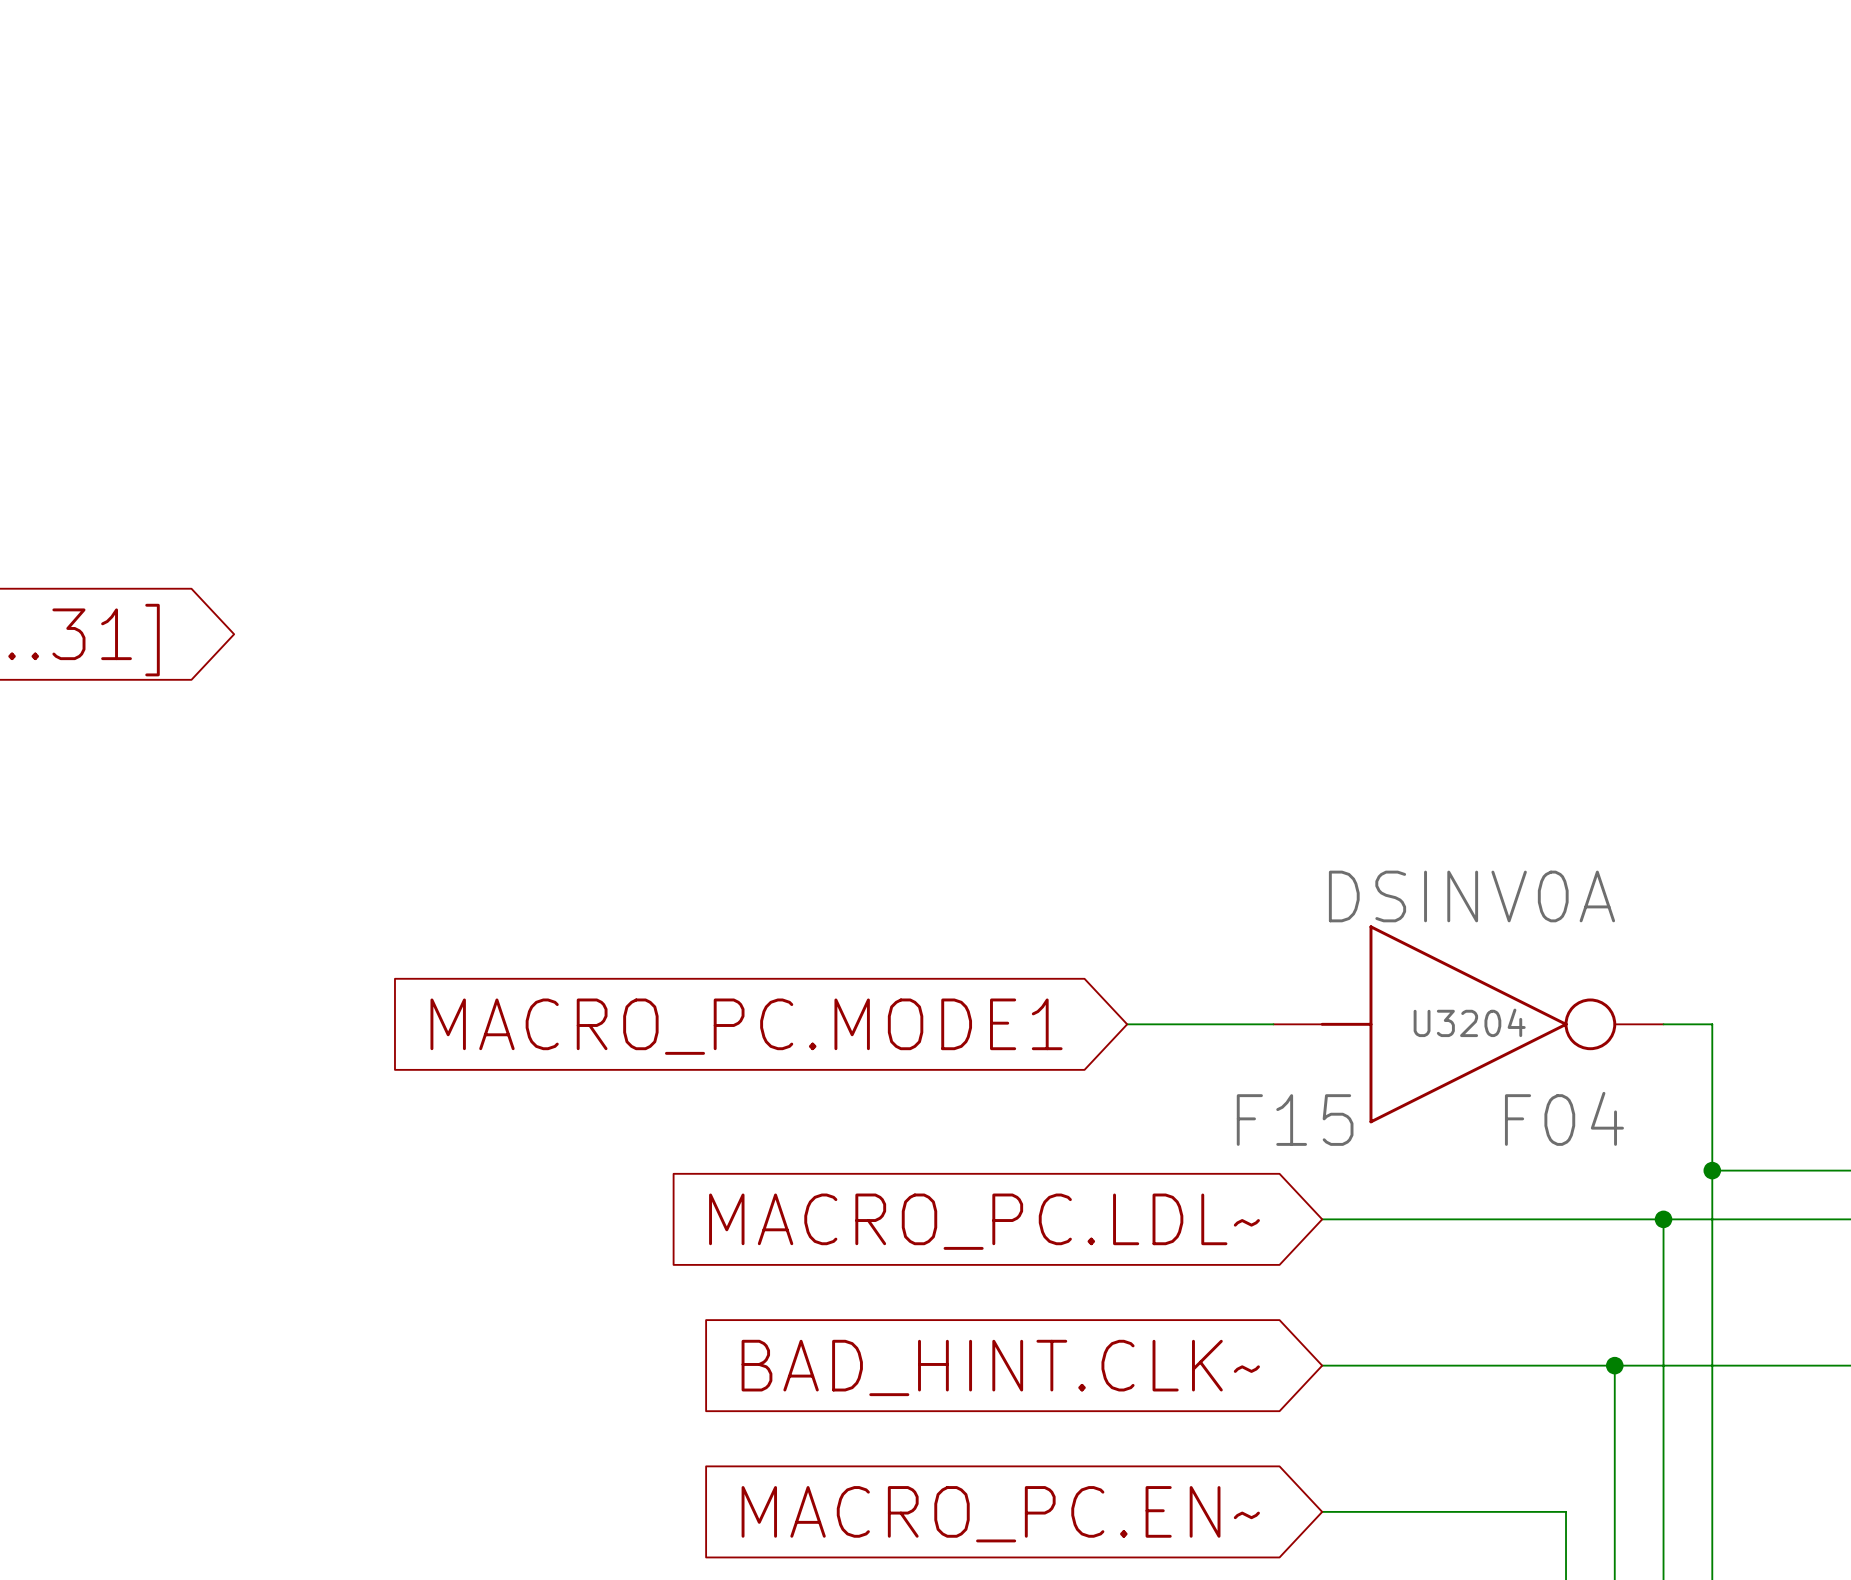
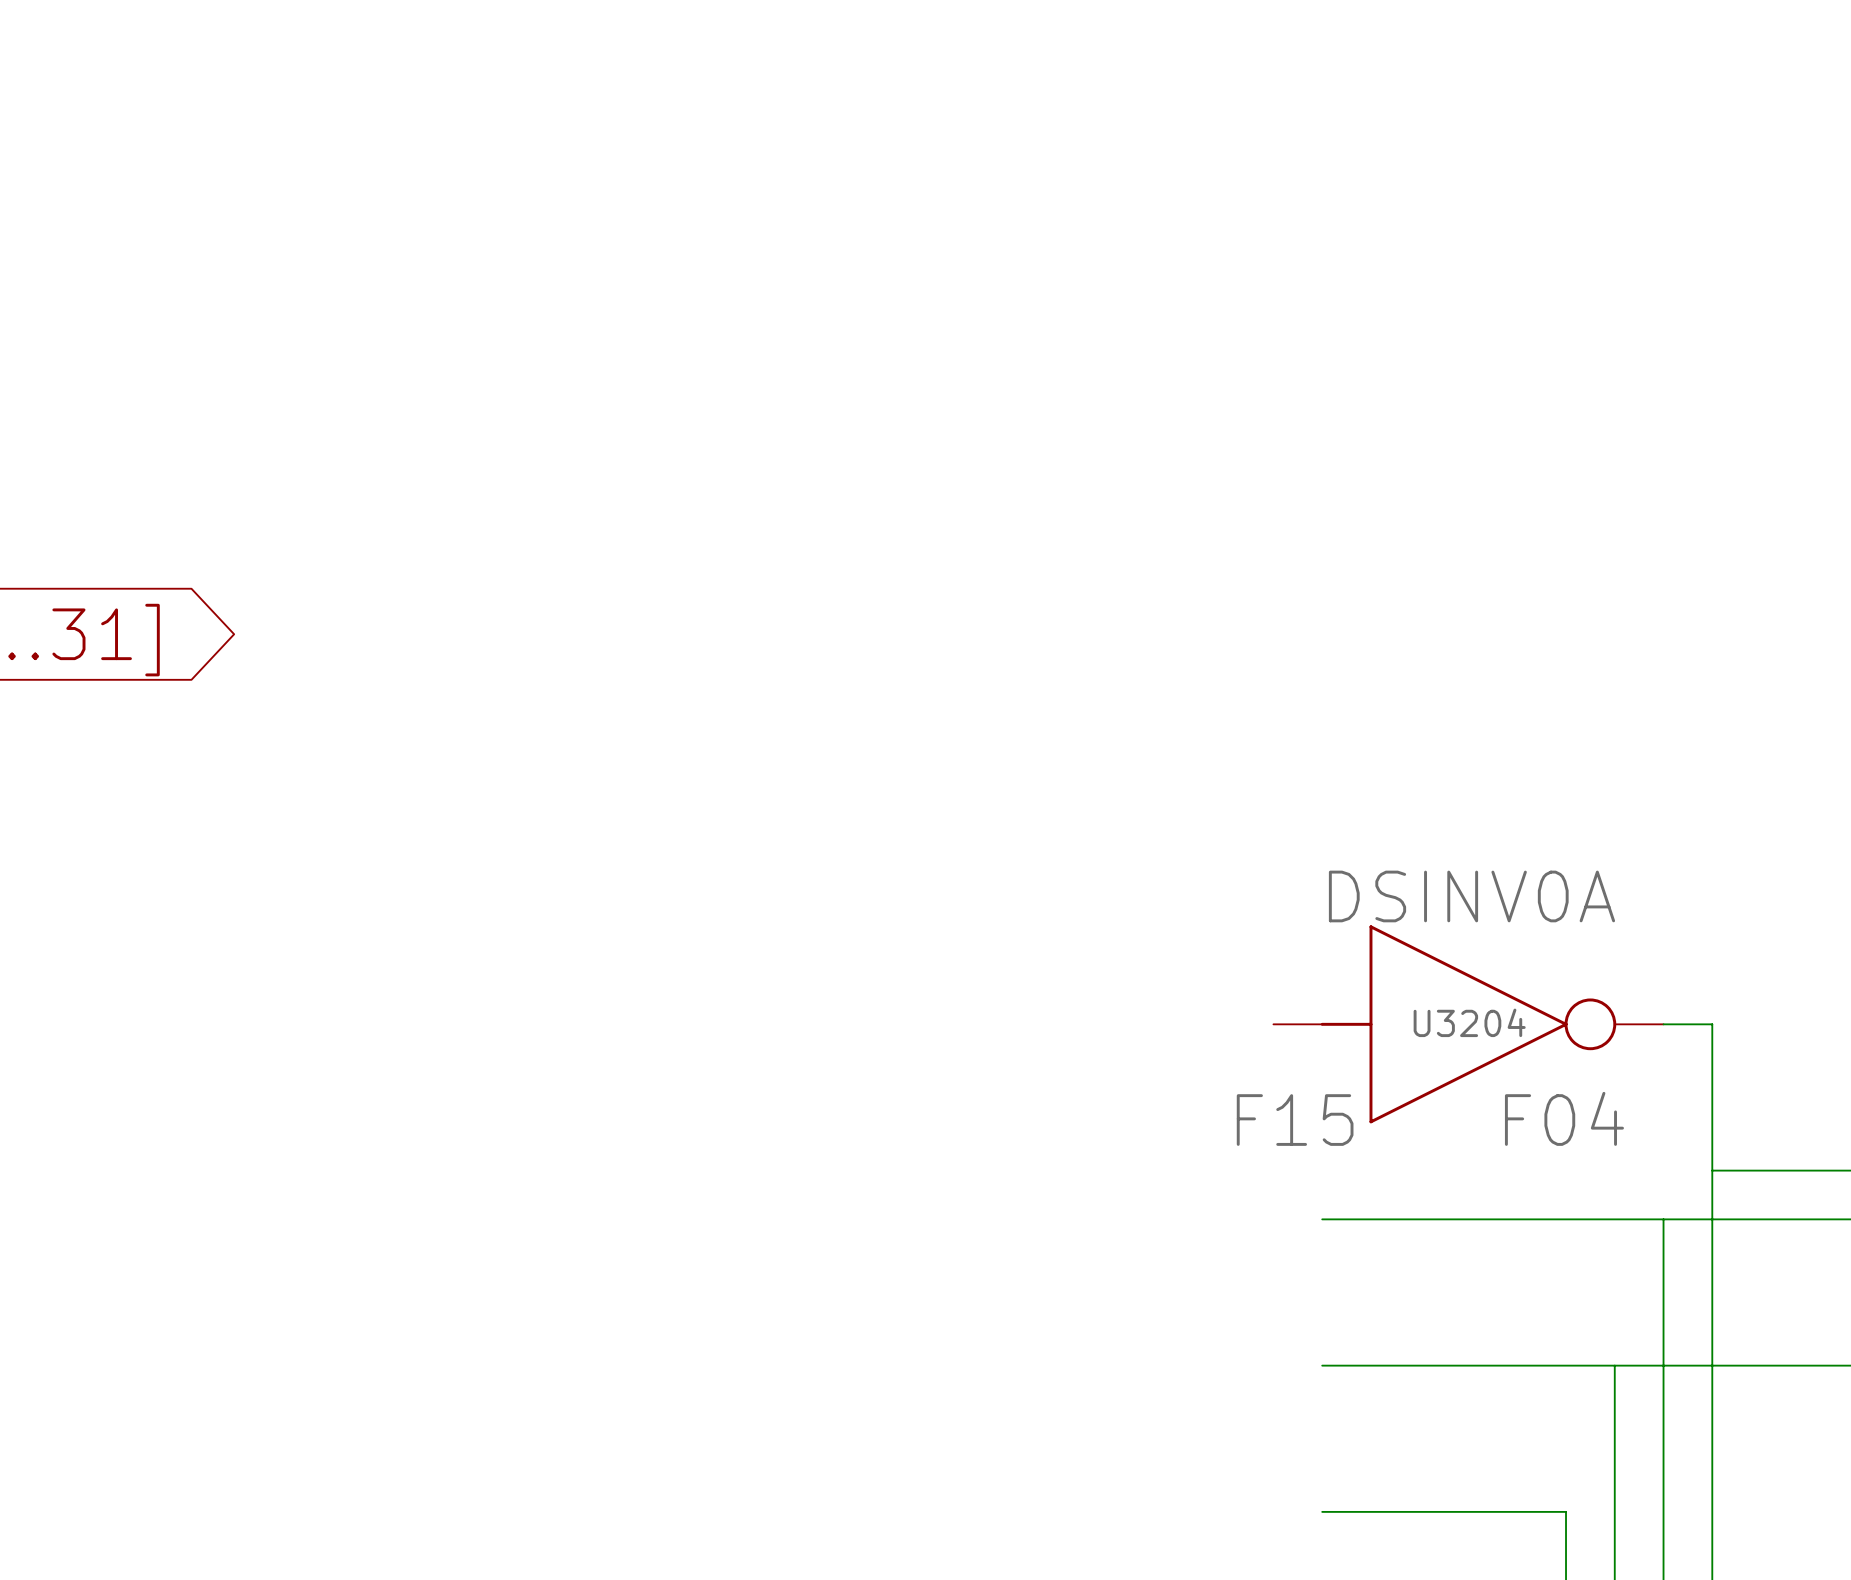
wire: (1127, 1024) (1273, 1024) -> none
global label: MACRO_PC.MODE1 (746, 1026) -> none
junction: (1712, 1170) -> none
junction: (1663, 1219) -> none
global label: MACRO_PC.LDL~ (984, 1221) -> none
junction: (1614, 1365) -> none
global label: BAD_HINT.CLK~ (1000, 1367) -> none
global label: MACRO_PC.EN~ (1000, 1514) -> none

